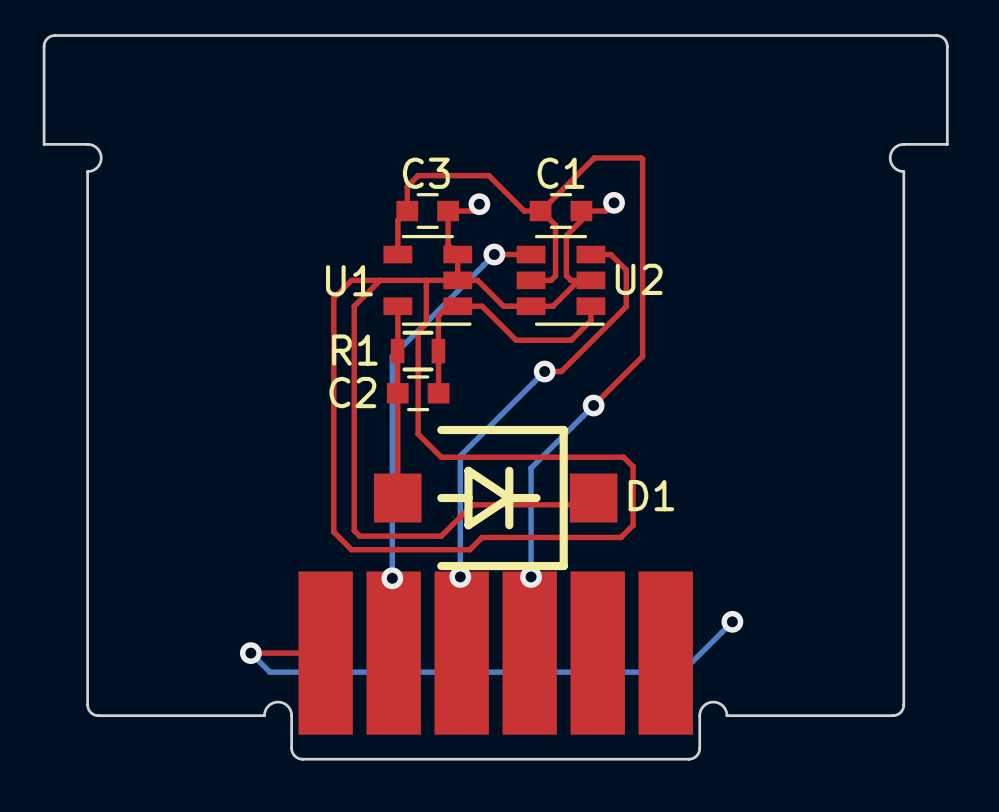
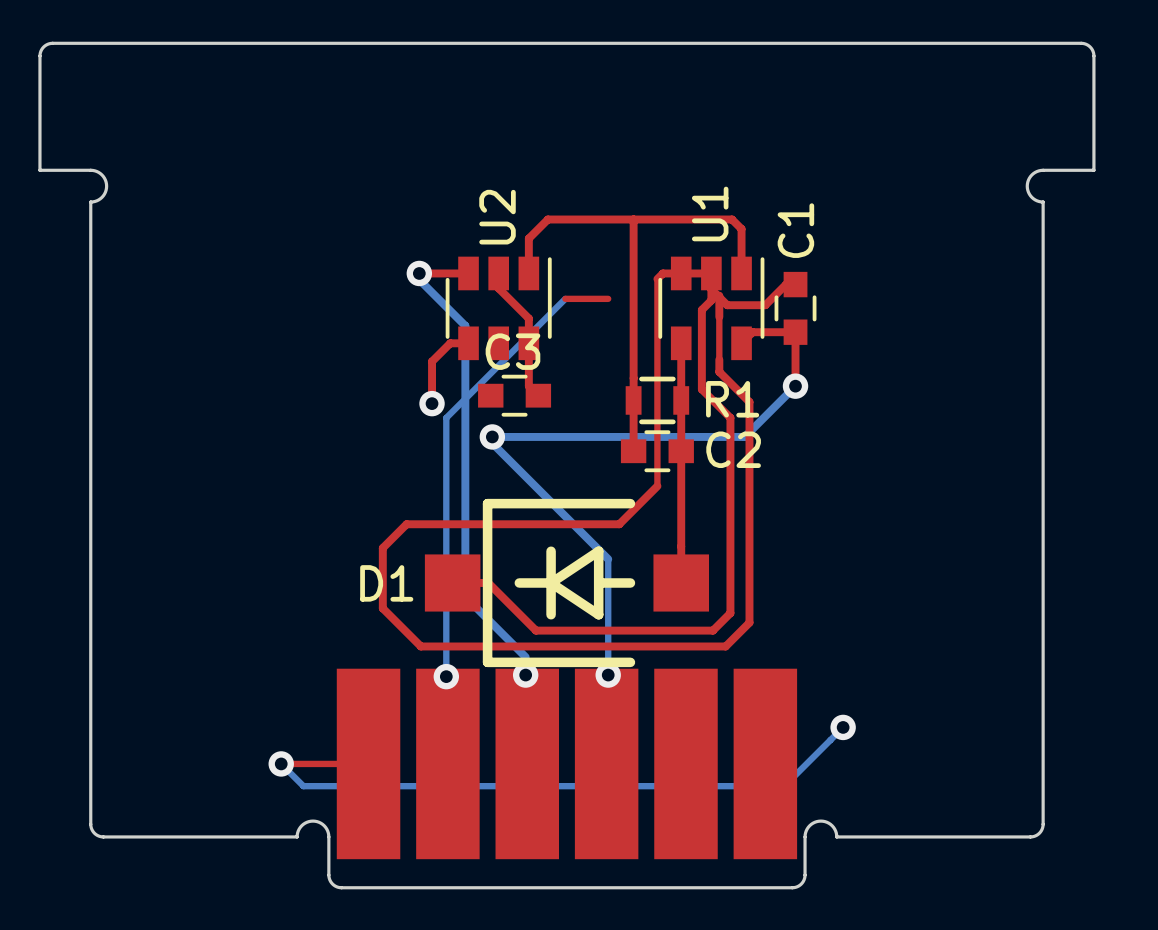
top track: none -> (633, 219) (633, 451)
top track: (614, 202) (605, 211) (581, 211) (581, 220) (566, 235) (566, 275) (571, 280) (590, 280) -> none
via: (614, 202) -> none
top track: (479, 204) (472, 211) (448, 211) (448, 244) (457, 254) (457, 280) -> none
via: (479, 204) -> none
C3 position: (427, 211) -> (514, 395)
top track: (541, 211) (594, 157) (642, 159) (642, 356) (593, 405) -> none
top track: (541, 211) (524, 211) (488, 175) (418, 175) (407, 186) (407, 211) (397, 220) (397, 254) -> none
top track: (541, 211) (555, 225) (555, 275) (550, 280) (531, 280) -> none
C1 rotation: 0° (561, 211) -> 90° clockwise (795, 308)
C1 position: (561, 211) -> (795, 308)
top track: none -> (419, 273) (468, 273)
via: none -> (419, 273)
top track: none -> (498, 273) (498, 288) (528, 318) (528, 386) (538, 395)
top track: none -> (528, 273) (528, 238) (547, 219) (732, 219) (741, 229) (741, 273)
top track: none -> (795, 284) (785, 284) (765, 305) (727, 305) (711, 289)
via: (494, 254) -> none
top track: (590, 254) (610, 254) (626, 270) -> (719, 295) (719, 316)
U1 name position: U1 (349, 280) -> U1 (710, 213)
top track: (380, 280) (354, 306) (354, 530) (359, 536) (441, 536) (472, 504) (587, 504) (593, 498) -> (681, 343) (681, 582)
top track: (426, 280) (426, 323) (418, 332) (418, 434) (441, 457) (623, 457) (633, 466) (633, 525) (620, 537) (482, 537) (469, 549) (351, 549) (333, 532) (333, 298) (351, 280) (477, 280) (503, 306) (552, 306) (578, 280) -> none
U1 rotation: 0° (427, 280) -> 90° counterclockwise (711, 308)
U1 position: (427, 280) -> (711, 308)
U2 rotation: 0° (561, 280) -> 90° counterclockwise (498, 308)
U2 position: (561, 280) -> (498, 308)
top track: none -> (468, 343) (450, 343) (432, 361) (432, 403)
top track: none -> (741, 343) (752, 332) (795, 332) (795, 386)
top track: (397, 306) (397, 350) -> none
top track: (590, 306) (590, 320) (571, 340) (516, 340) (482, 306) (448, 306) (438, 315) (438, 351) -> none
top track: (626, 306) (561, 371) (544, 371) -> (719, 359) (719, 371) (749, 402) (749, 622) (725, 646) (420, 646) (382, 608) (382, 548) (406, 524) (619, 524) (657, 486) (657, 279) (662, 273) (711, 273) (711, 300) (701, 309) (701, 389) (730, 417) (730, 613) (712, 630) (535, 630) (488, 582) (452, 582)
via: none -> (795, 386)
via: none -> (432, 403)
R1 name position: R1 (354, 350) -> R1 (732, 399)
top track: (397, 351) (397, 393) -> none
R1 position: (418, 351) -> (657, 400)
top track: (438, 351) (438, 393) -> none
bottom track: (544, 371) (460, 455) (460, 561) -> (419, 273) (419, 279) (465, 325) (465, 596) (525, 657)
via: (544, 371) -> none
via: none -> (492, 436)
C2 name position: C2 (352, 392) -> C2 (733, 449)
top track: (397, 393) (397, 498) -> none
C2 position: (418, 393) -> (657, 451)
bottom track: (593, 405) (531, 468) (531, 477) -> (795, 386) (744, 436) (492, 436) (492, 443) (608, 559)
via: (593, 405) -> none
D1 rotation: 0° (495, 498) -> 180° (566, 582)

